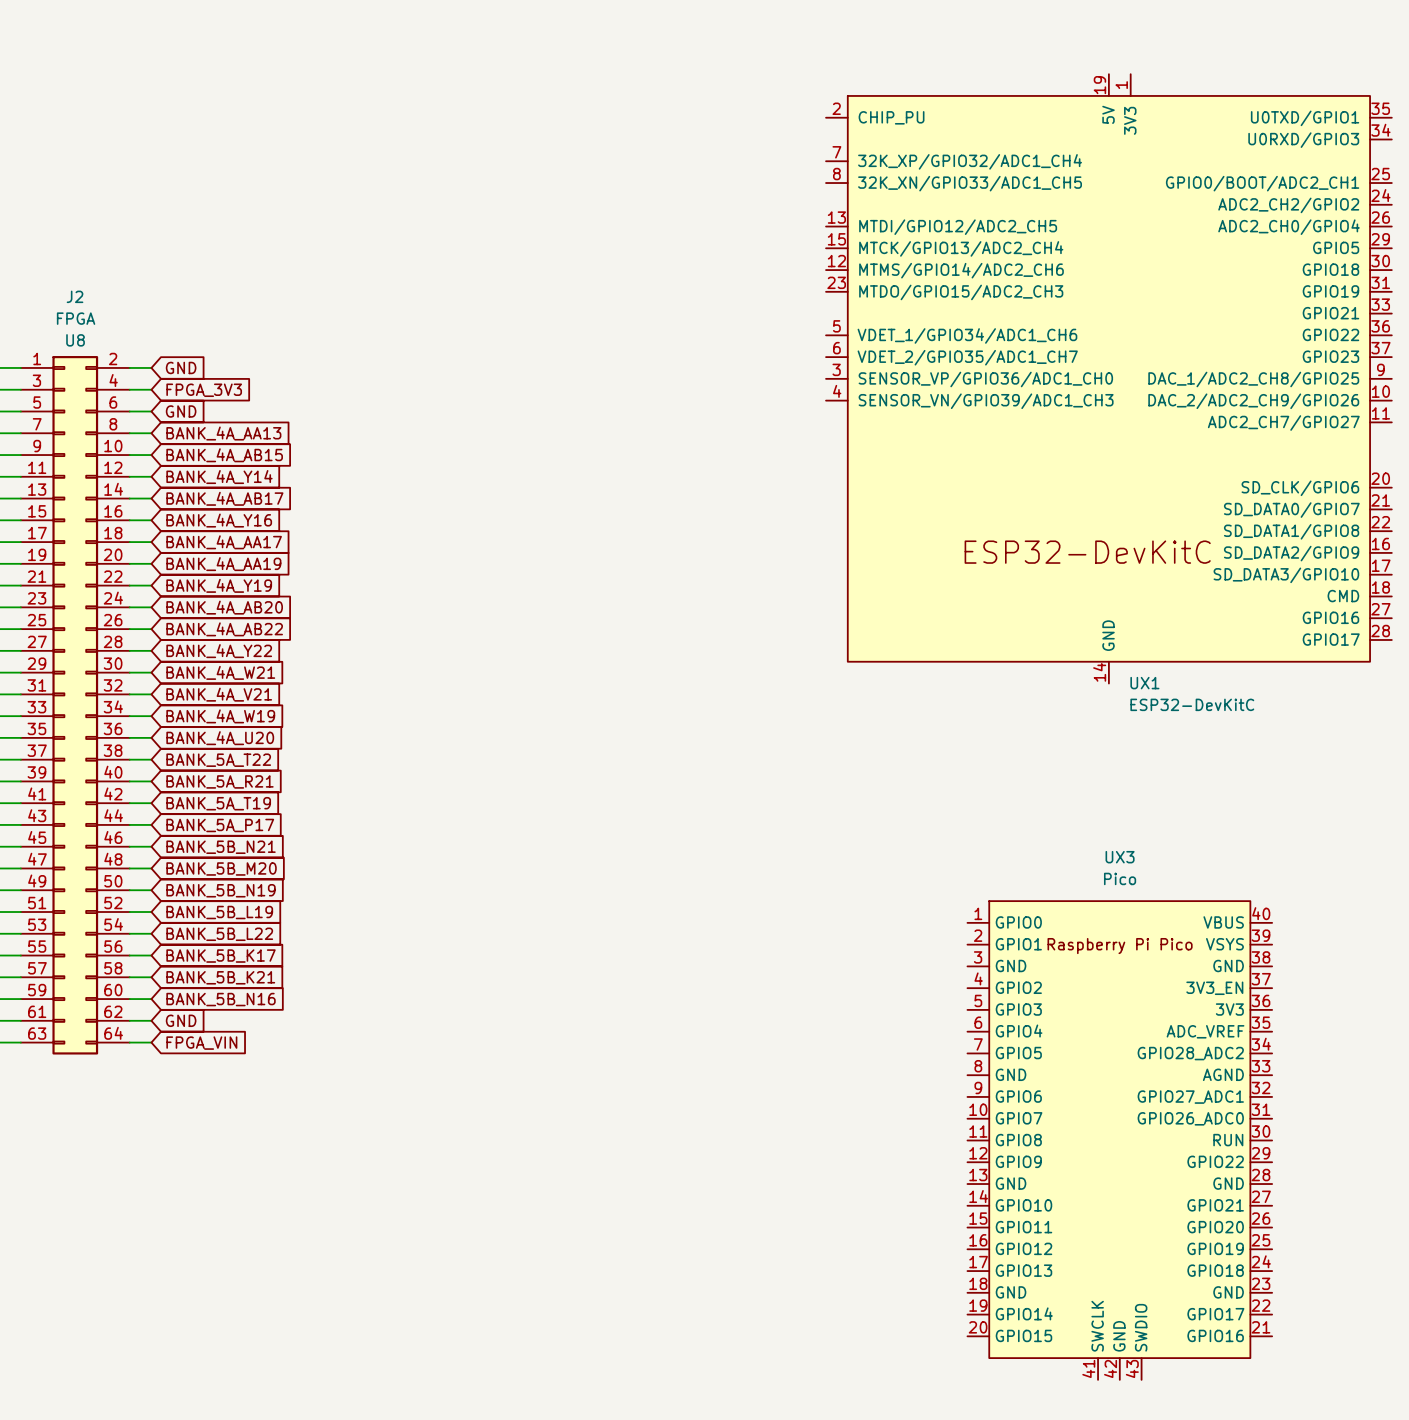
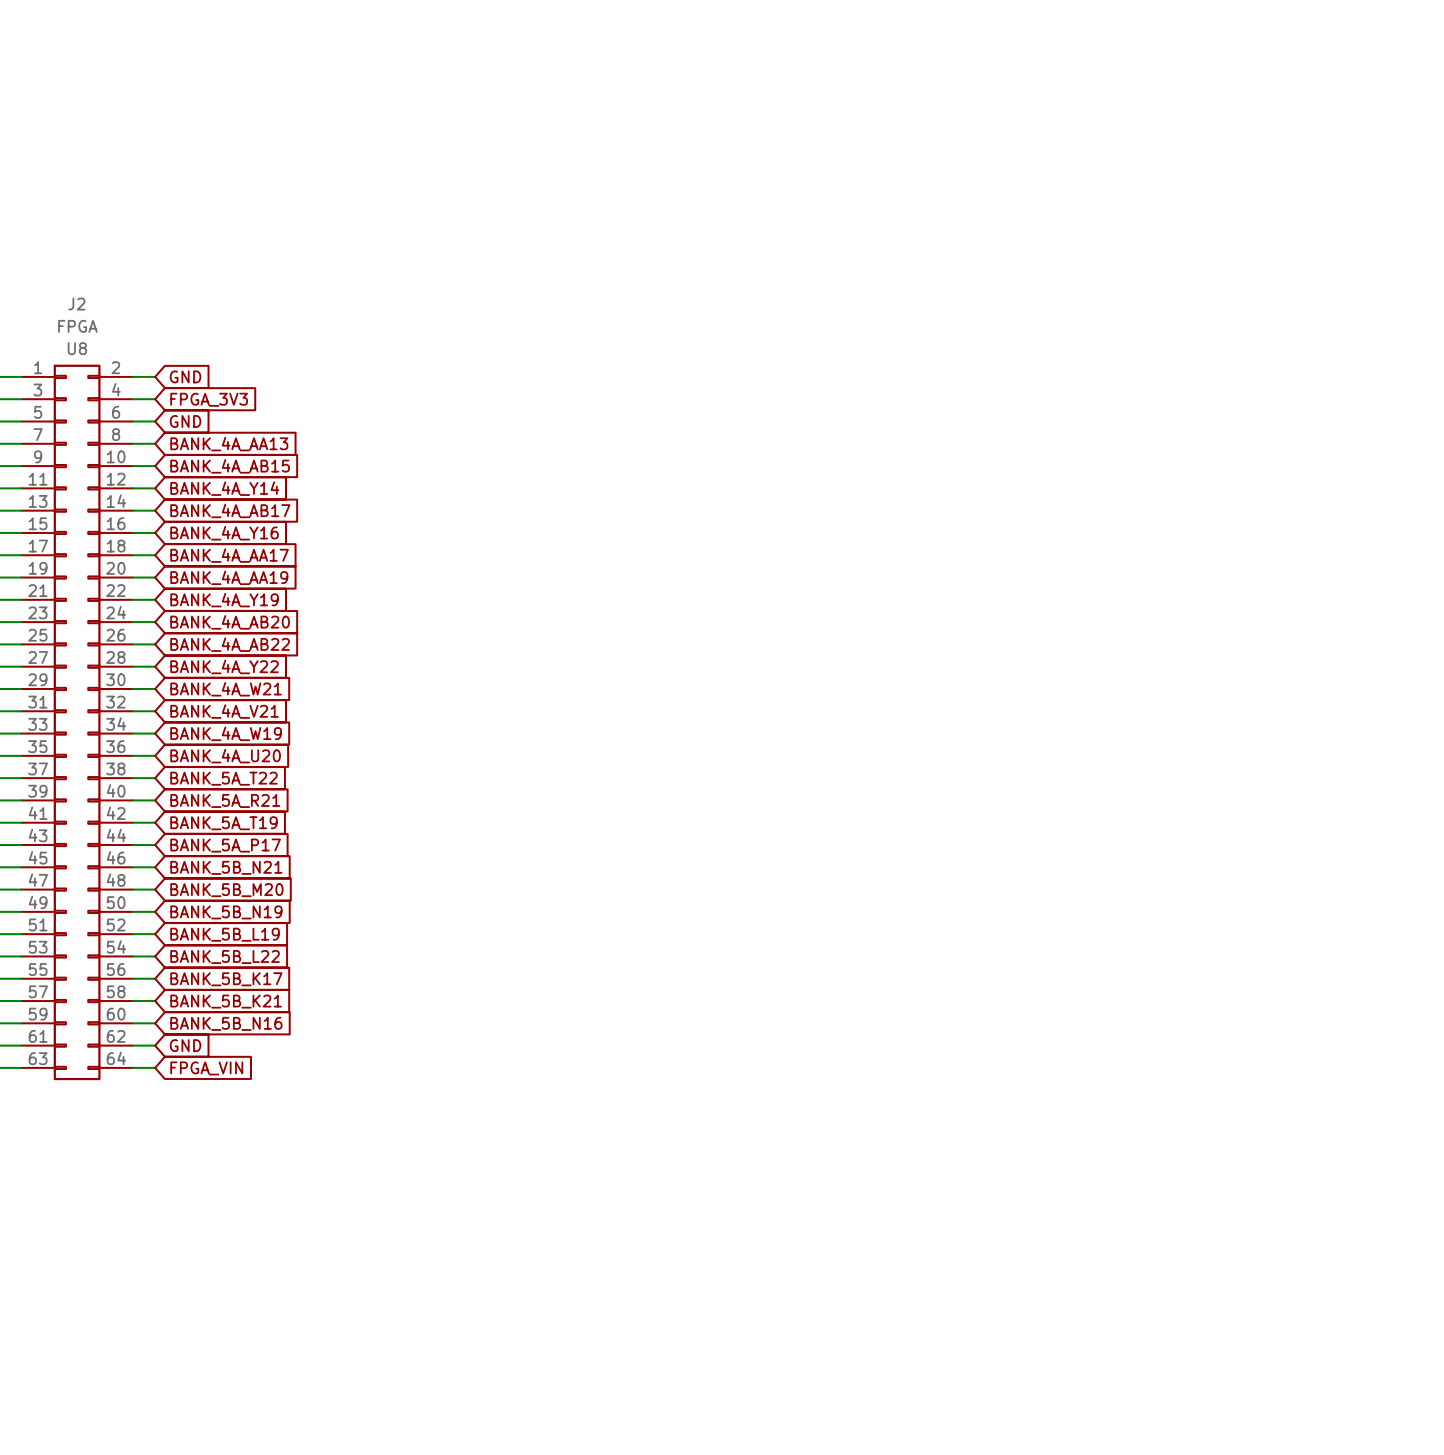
UX1: ESP32-DevKitC (1108, 378) -> none
UX3: Pico (1119, 1140) -> none

